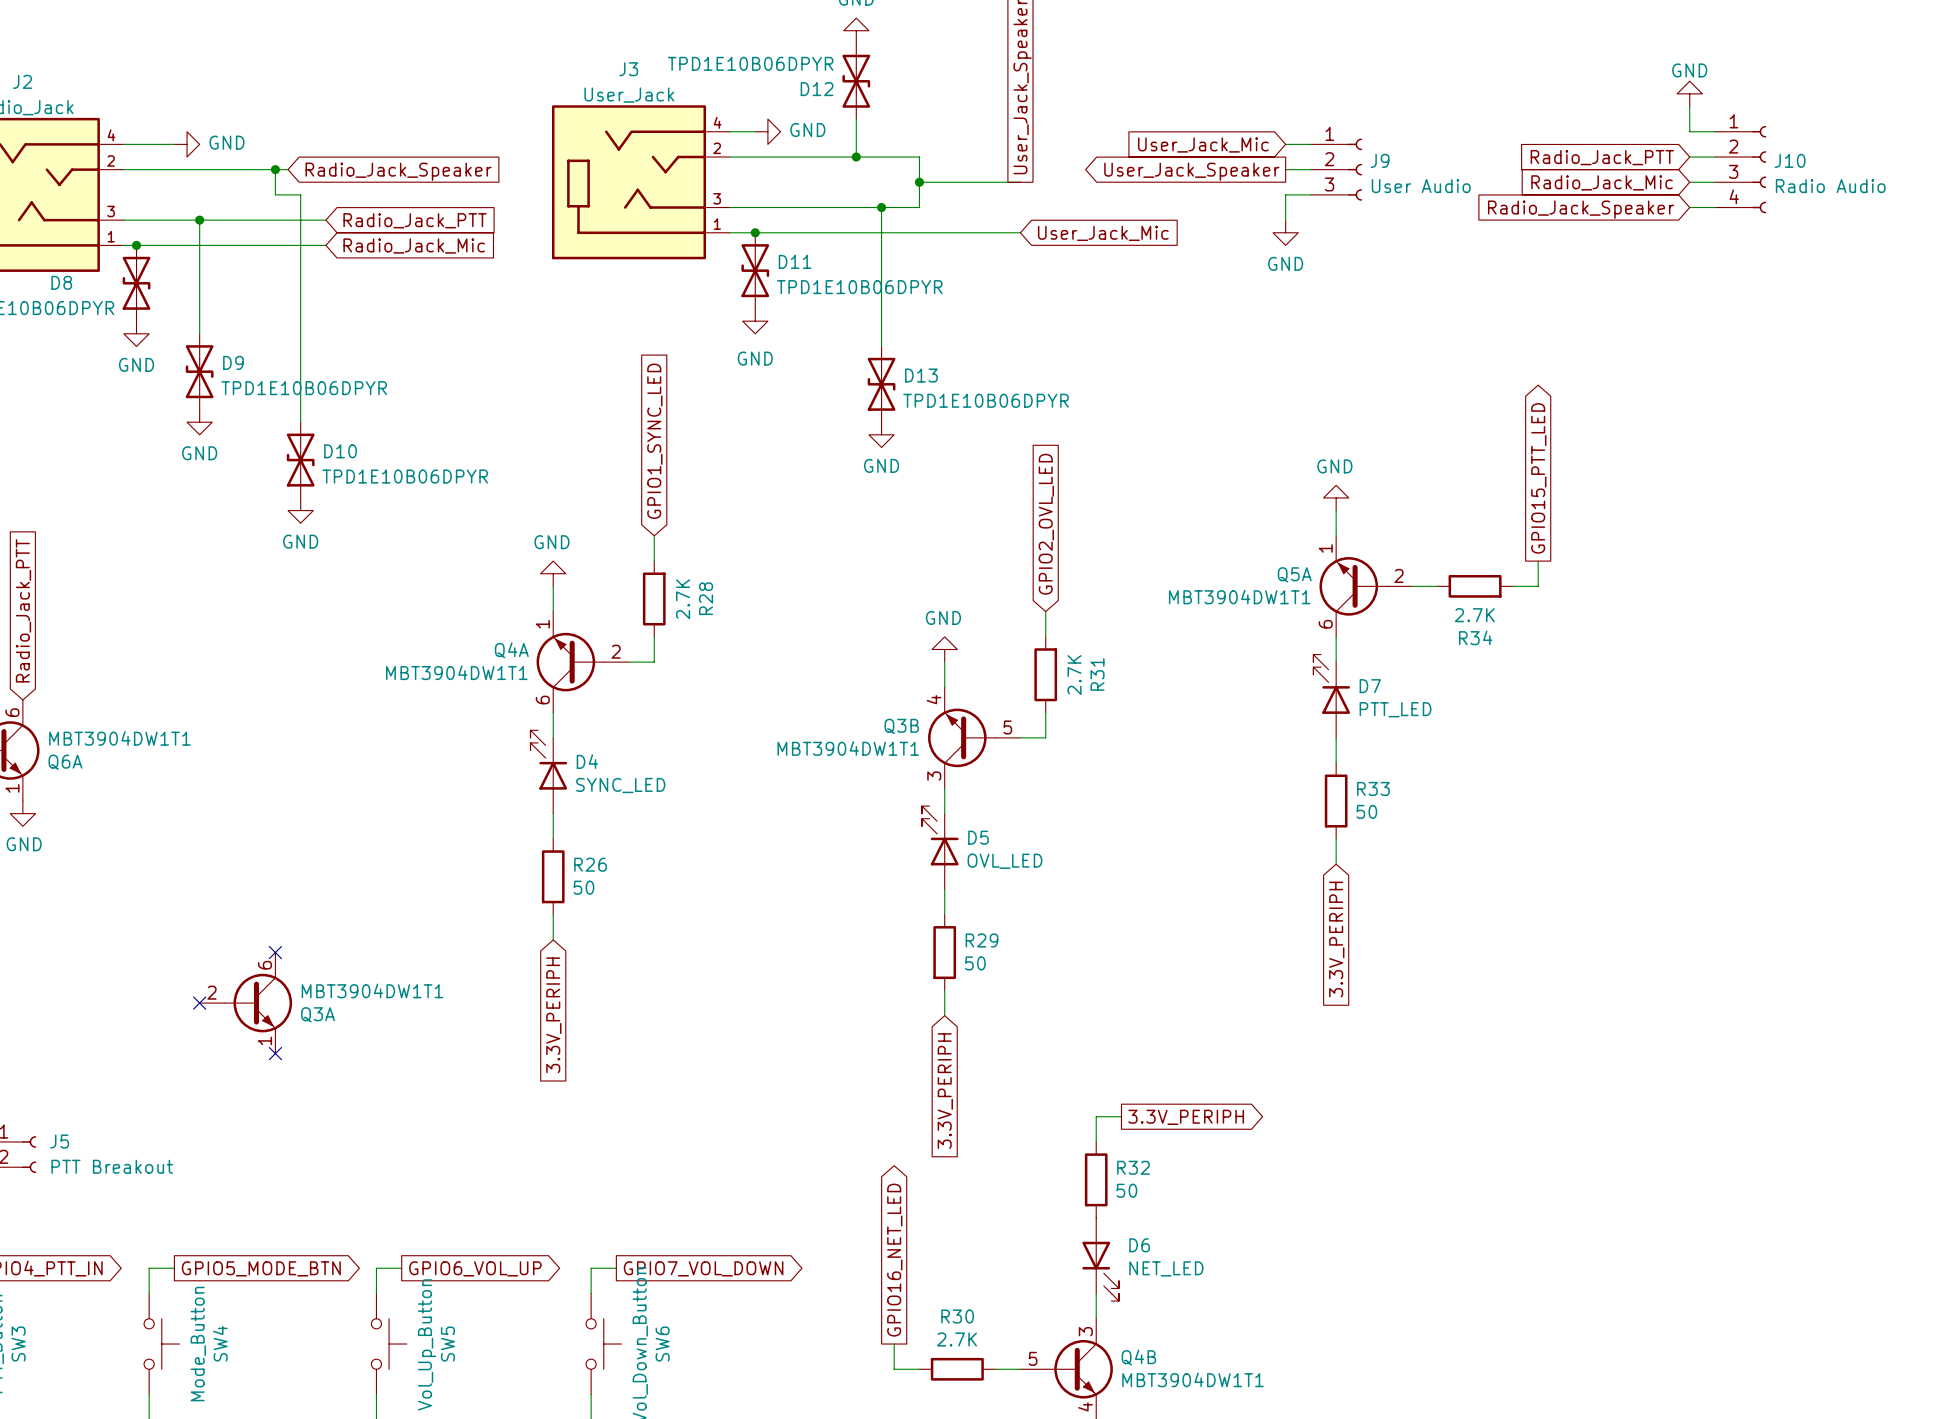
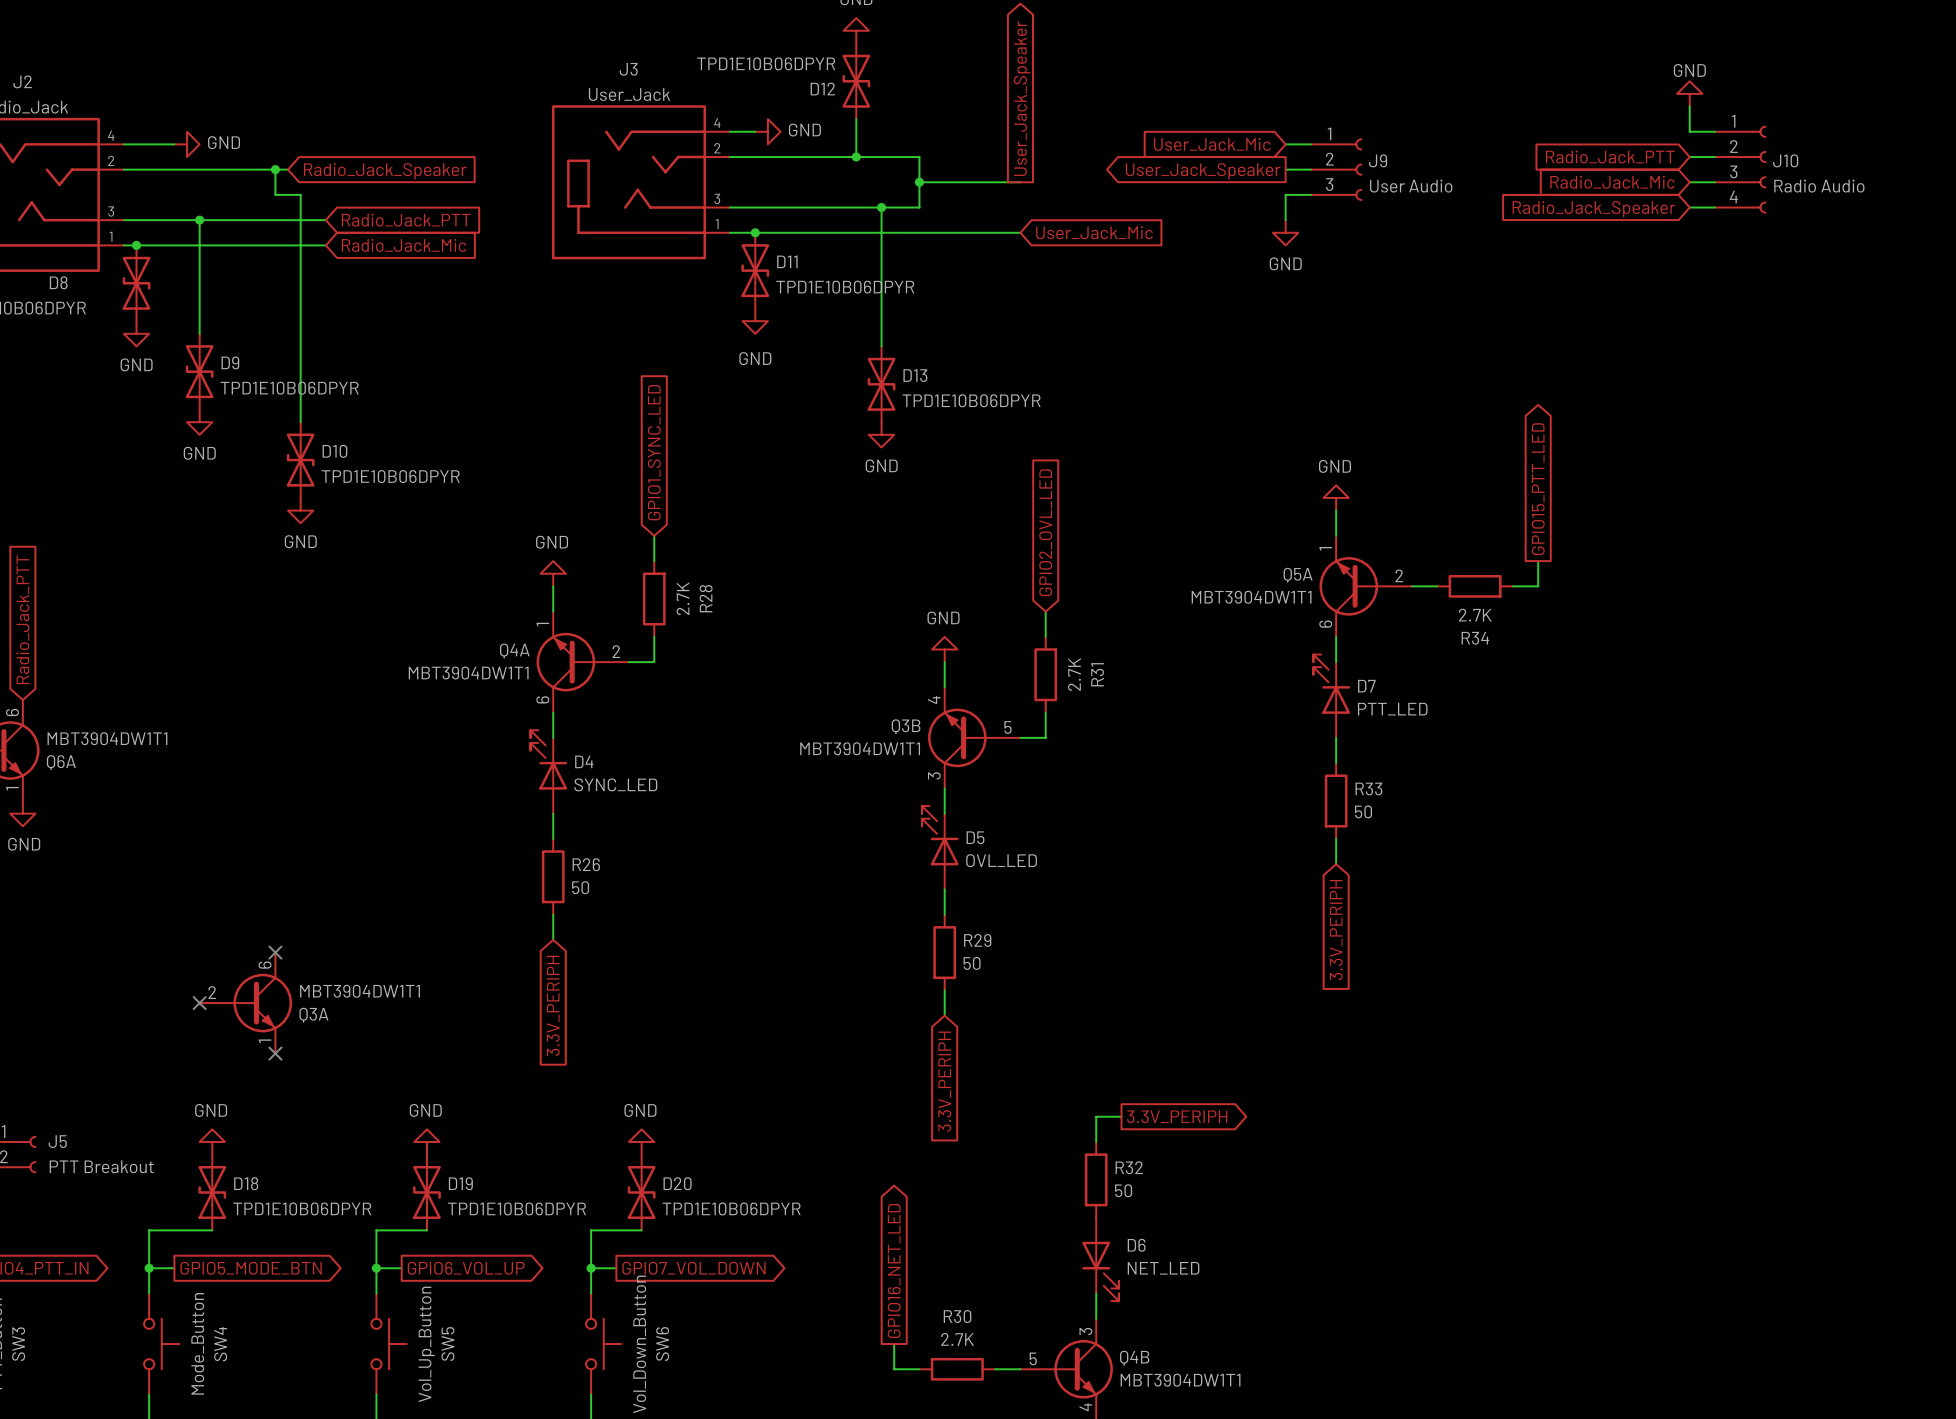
power symbol: none -> GND (212, 1141)
power symbol: none -> GND (426, 1141)
power symbol: none -> GND (641, 1141)
D18: none -> TPD1E10B06DPYR (212, 1192)
D19: none -> TPD1E10B06DPYR (426, 1192)
D20: none -> TPD1E10B06DPYR (641, 1192)
wire: none -> (212, 1230) (149, 1230) (149, 1268)
wire: none -> (426, 1230) (376, 1230) (376, 1268)
wire: none -> (641, 1230) (591, 1230) (591, 1268)
junction: none -> (149, 1268)
junction: none -> (376, 1268)
junction: none -> (591, 1268)

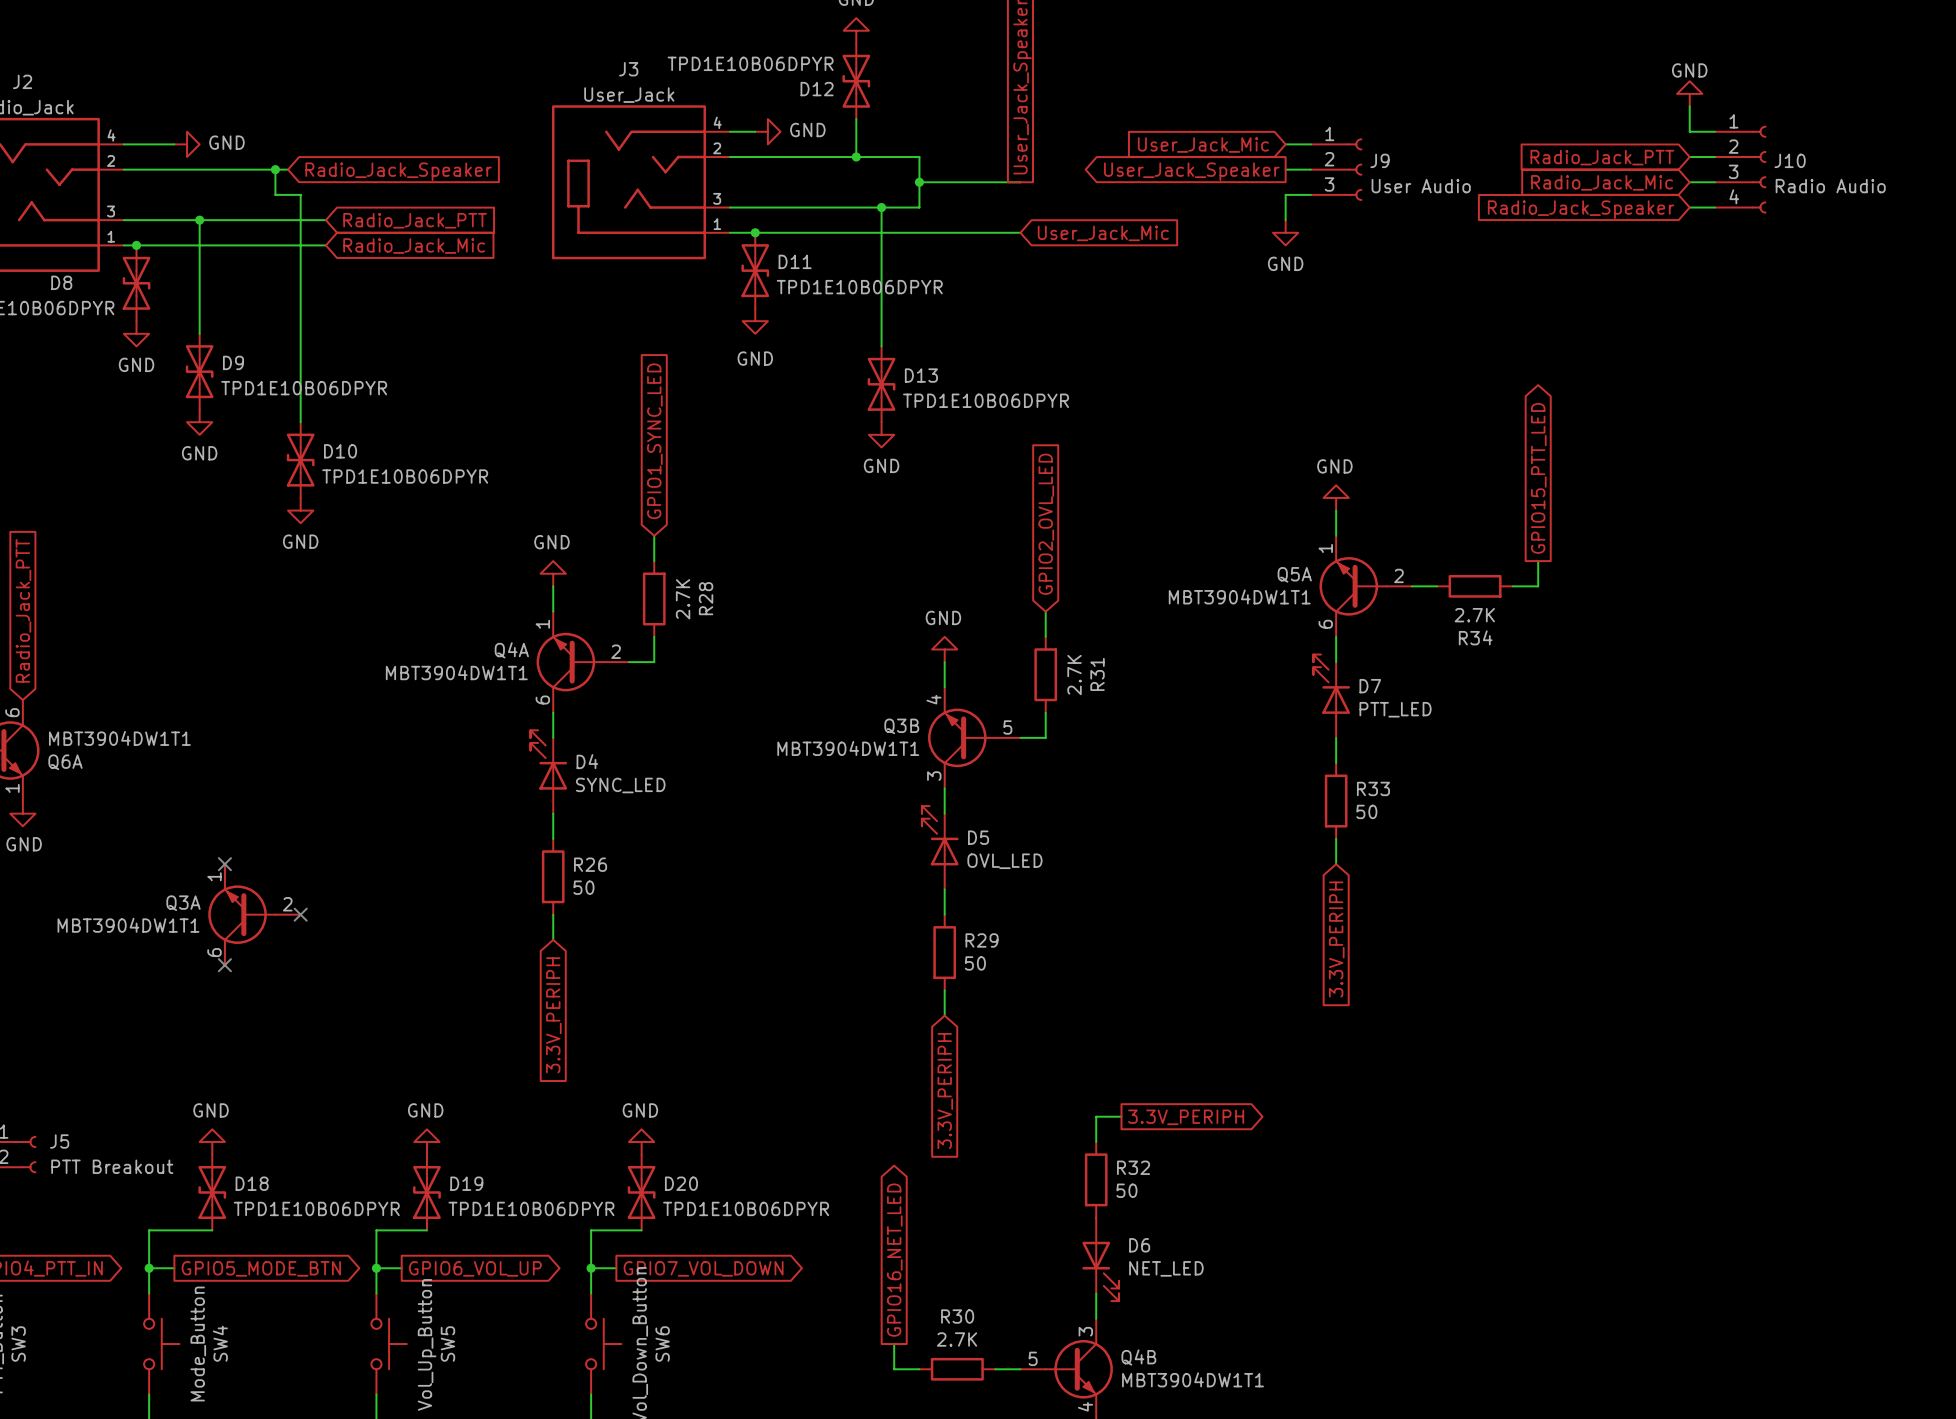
no-connect mark: none -> (224, 864)
no-connect mark: none -> (300, 914)
no-connect mark: (275, 952) -> none
no-connect mark: none -> (224, 965)
no-connect mark: (199, 1003) -> none
Q3A position: (245, 1003) -> (254, 914)
Q3A rotation: 0° (258, 1003) -> 180° (241, 914)
no-connect mark: (275, 1053) -> none

